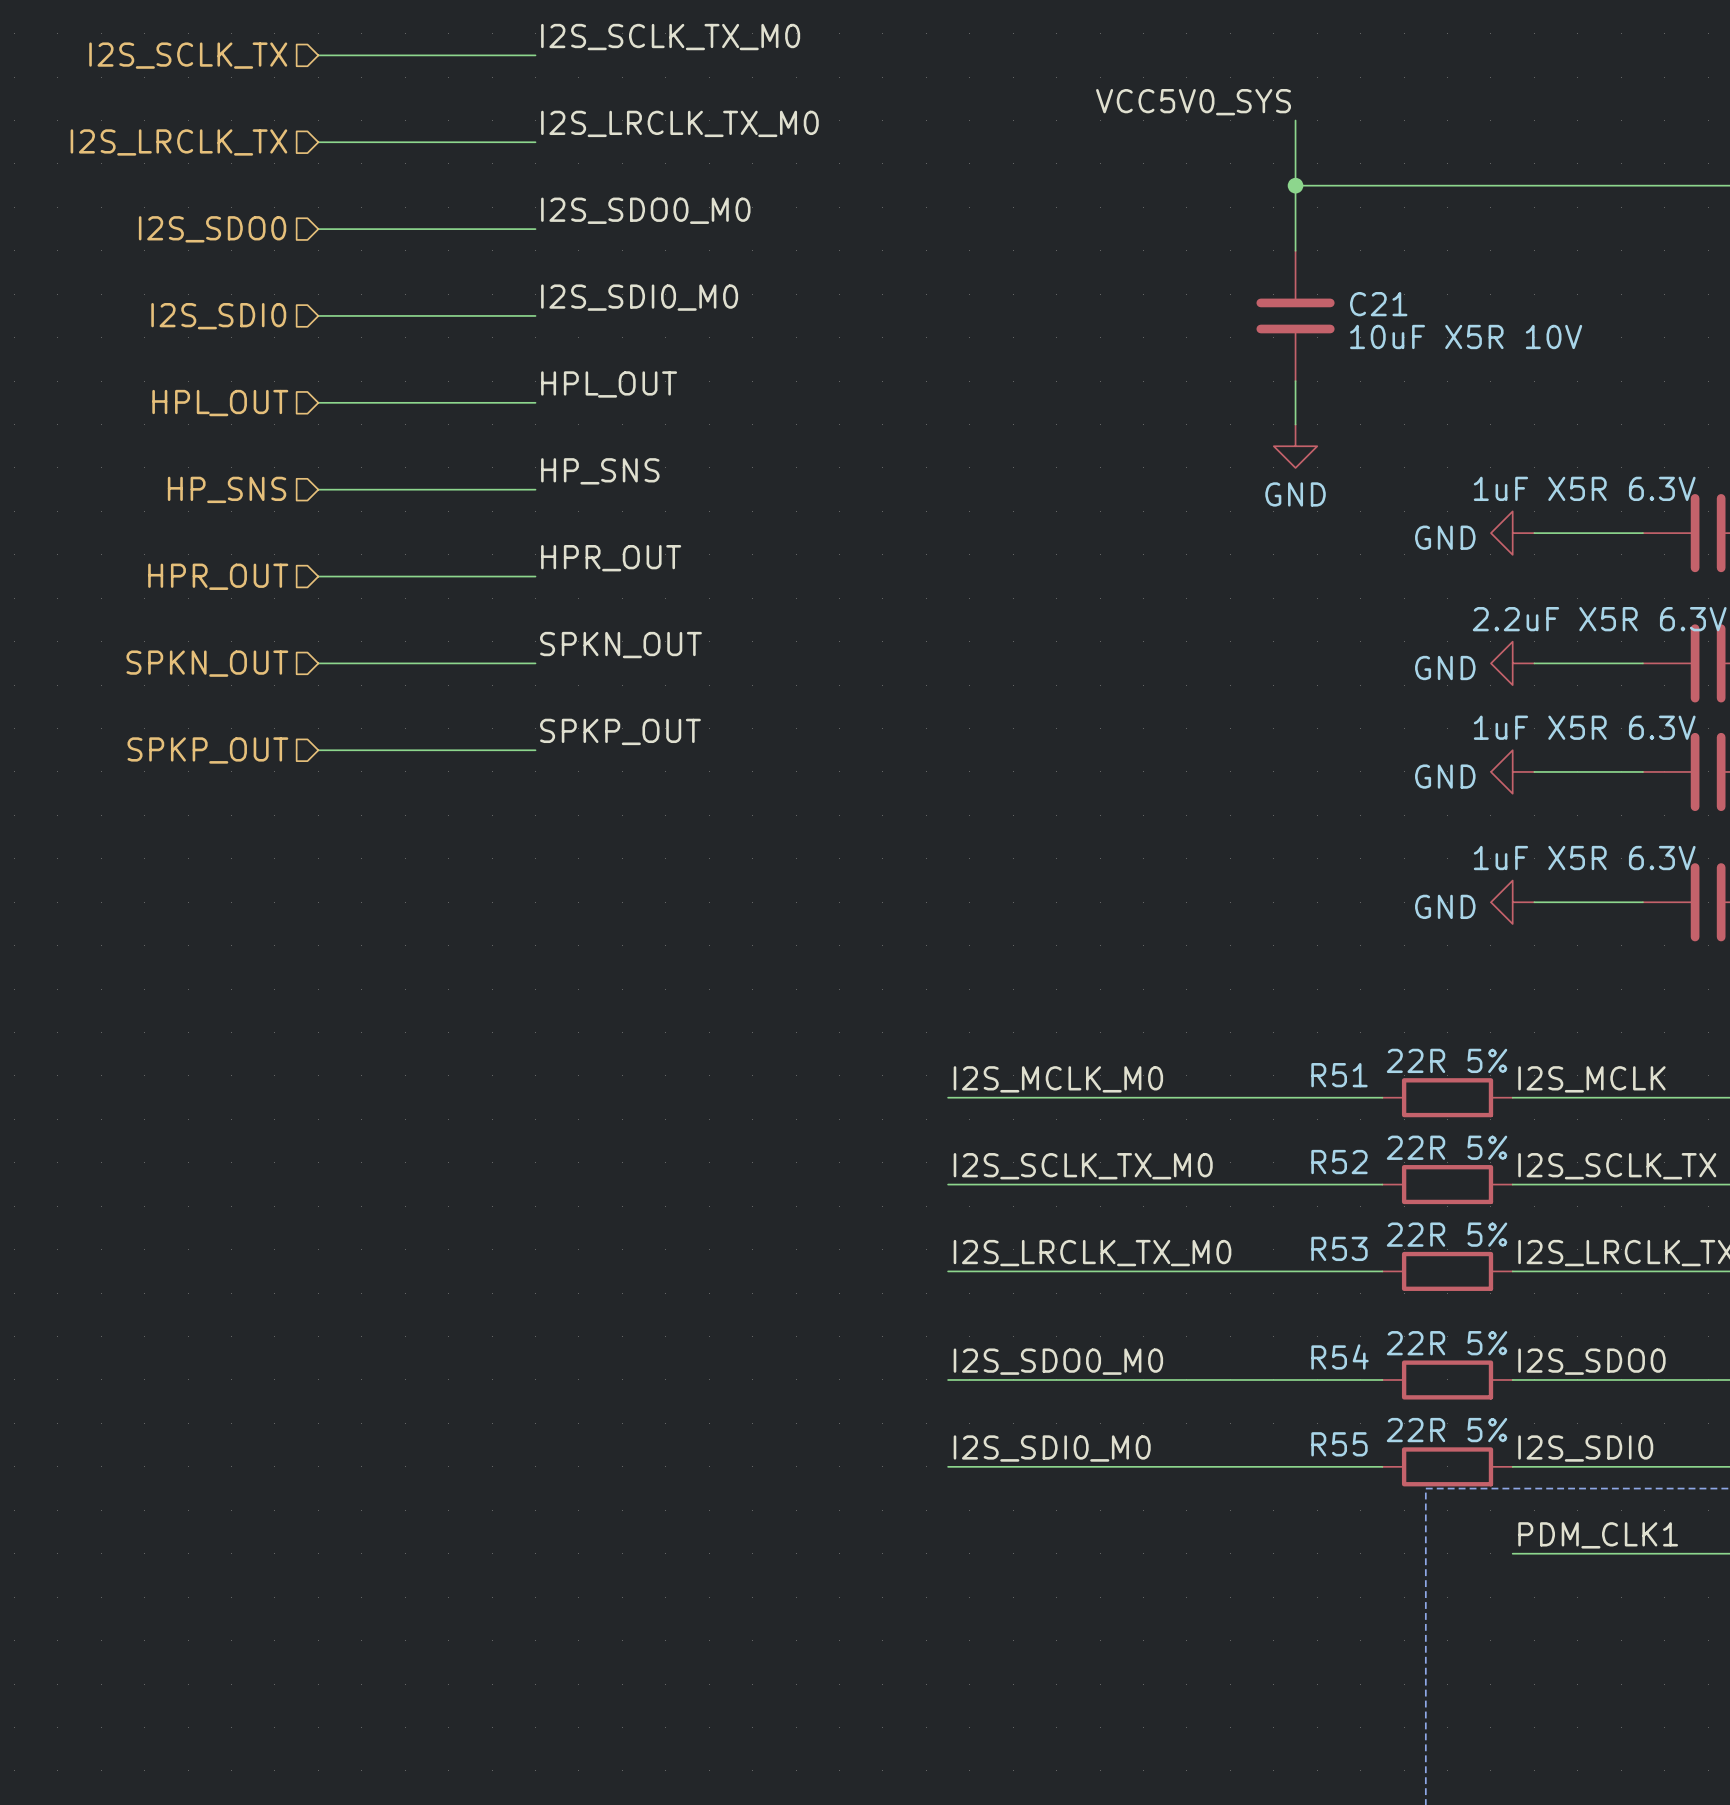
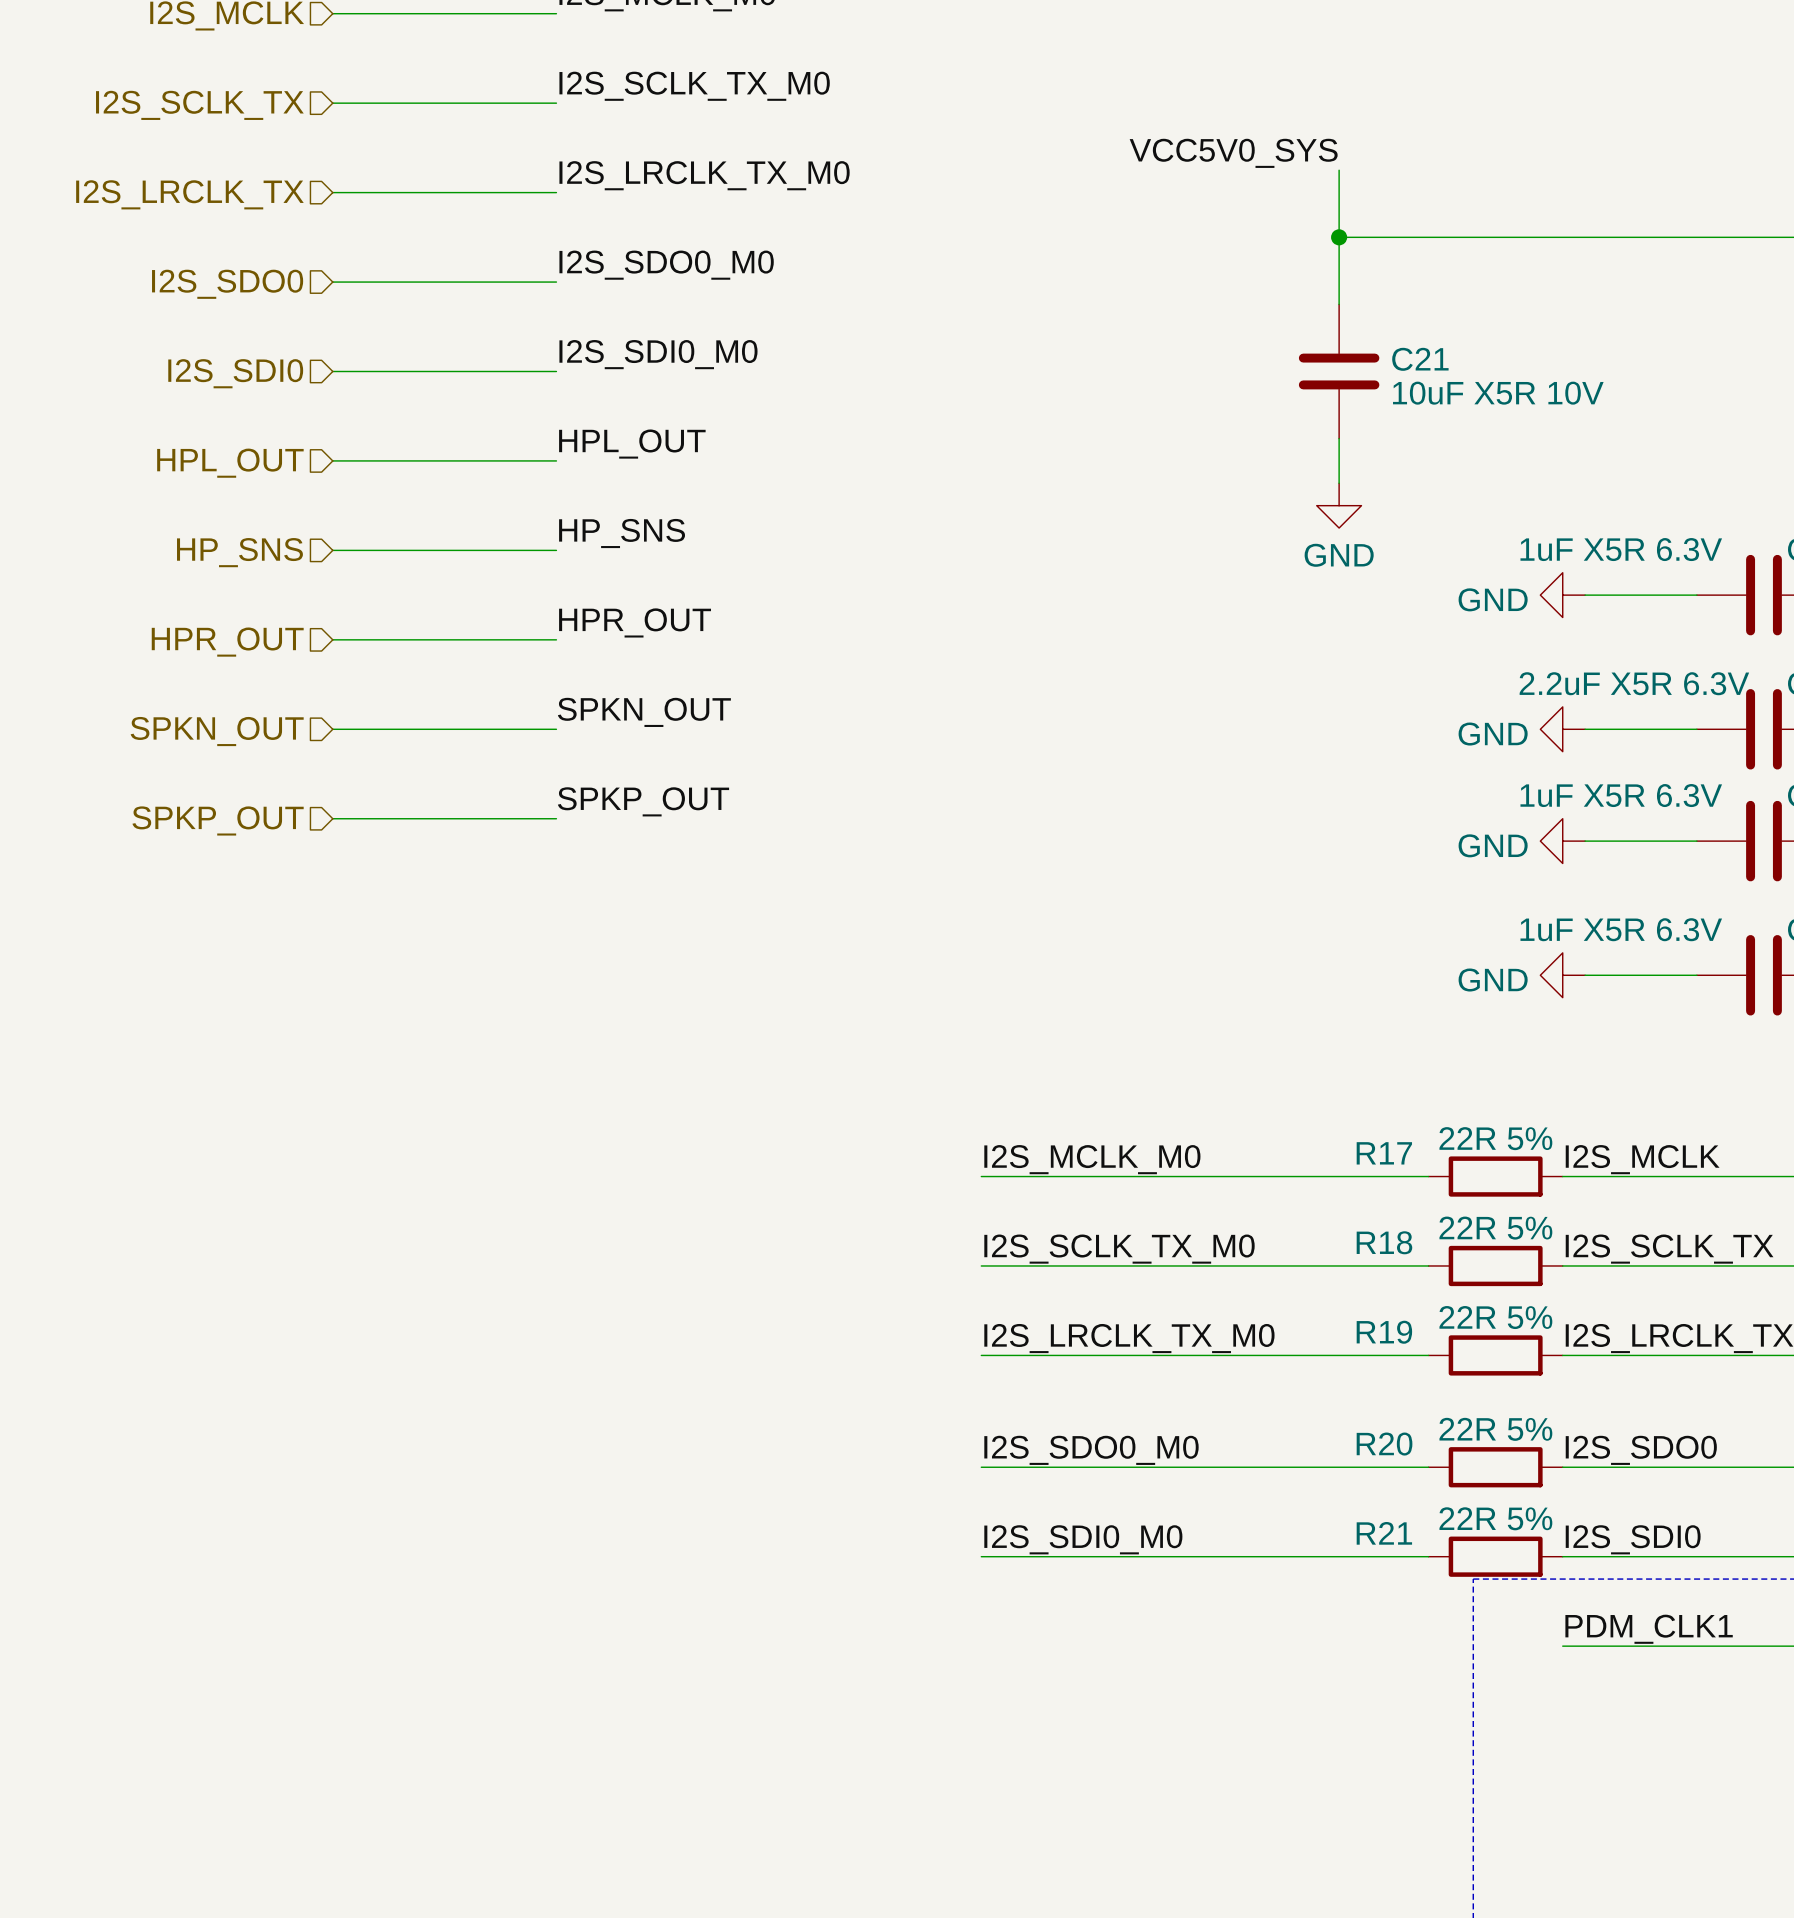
R51 name: R51 (1339, 1075) -> R17 (1384, 1153)
R52 name: R52 (1339, 1162) -> R18 (1384, 1242)
R53 name: R53 (1339, 1248) -> R19 (1384, 1332)
R54 name: R54 (1340, 1356) -> R20 (1384, 1444)
R55 name: R55 (1339, 1444) -> R21 (1384, 1533)

